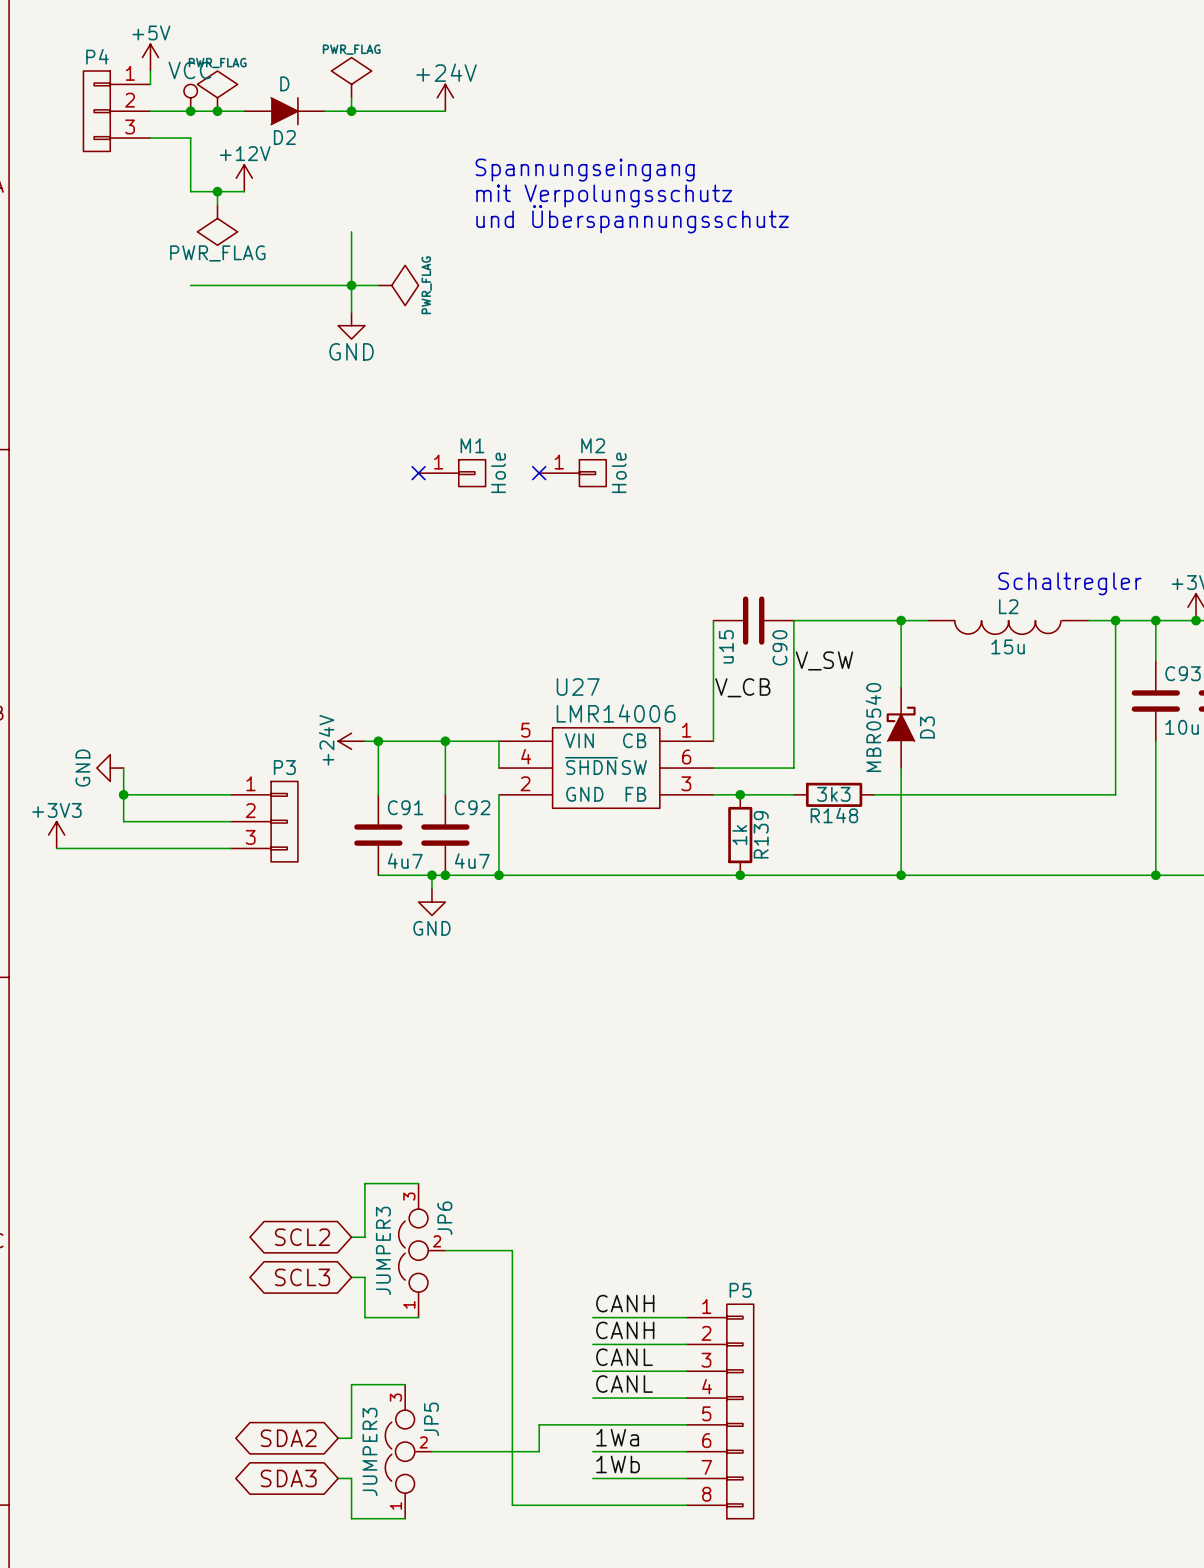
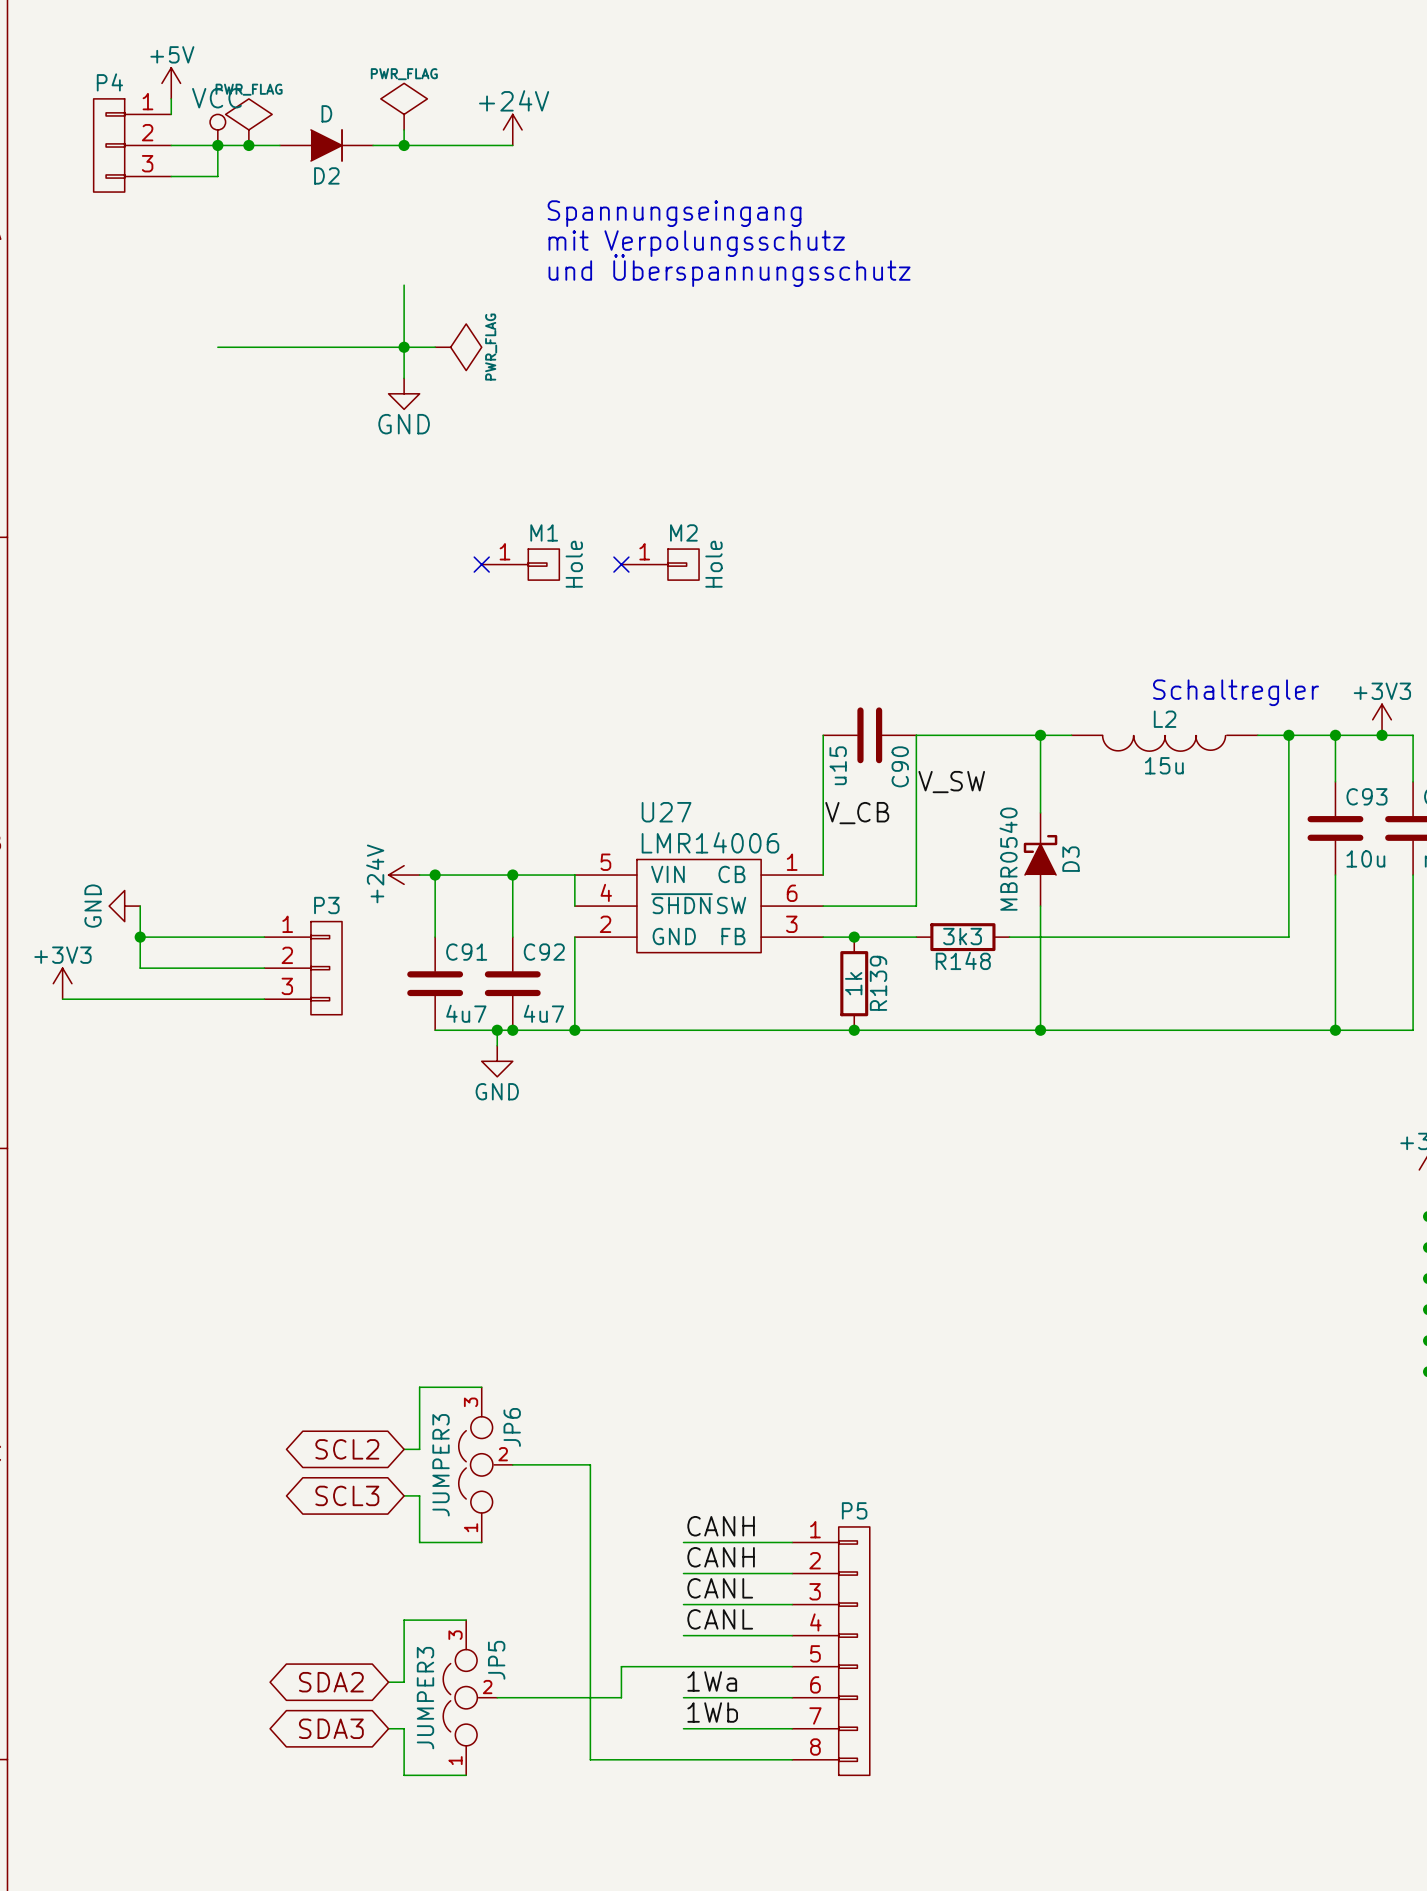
wire: (190, 138) (190, 191) (244, 191) -> (217, 176) (217, 145)
power symbol: +12V (244, 178) -> none
wire: (217, 191) (217, 205) -> none
junction: (217, 191) -> none
power symbol: PWR_FLAG (217, 225) -> none

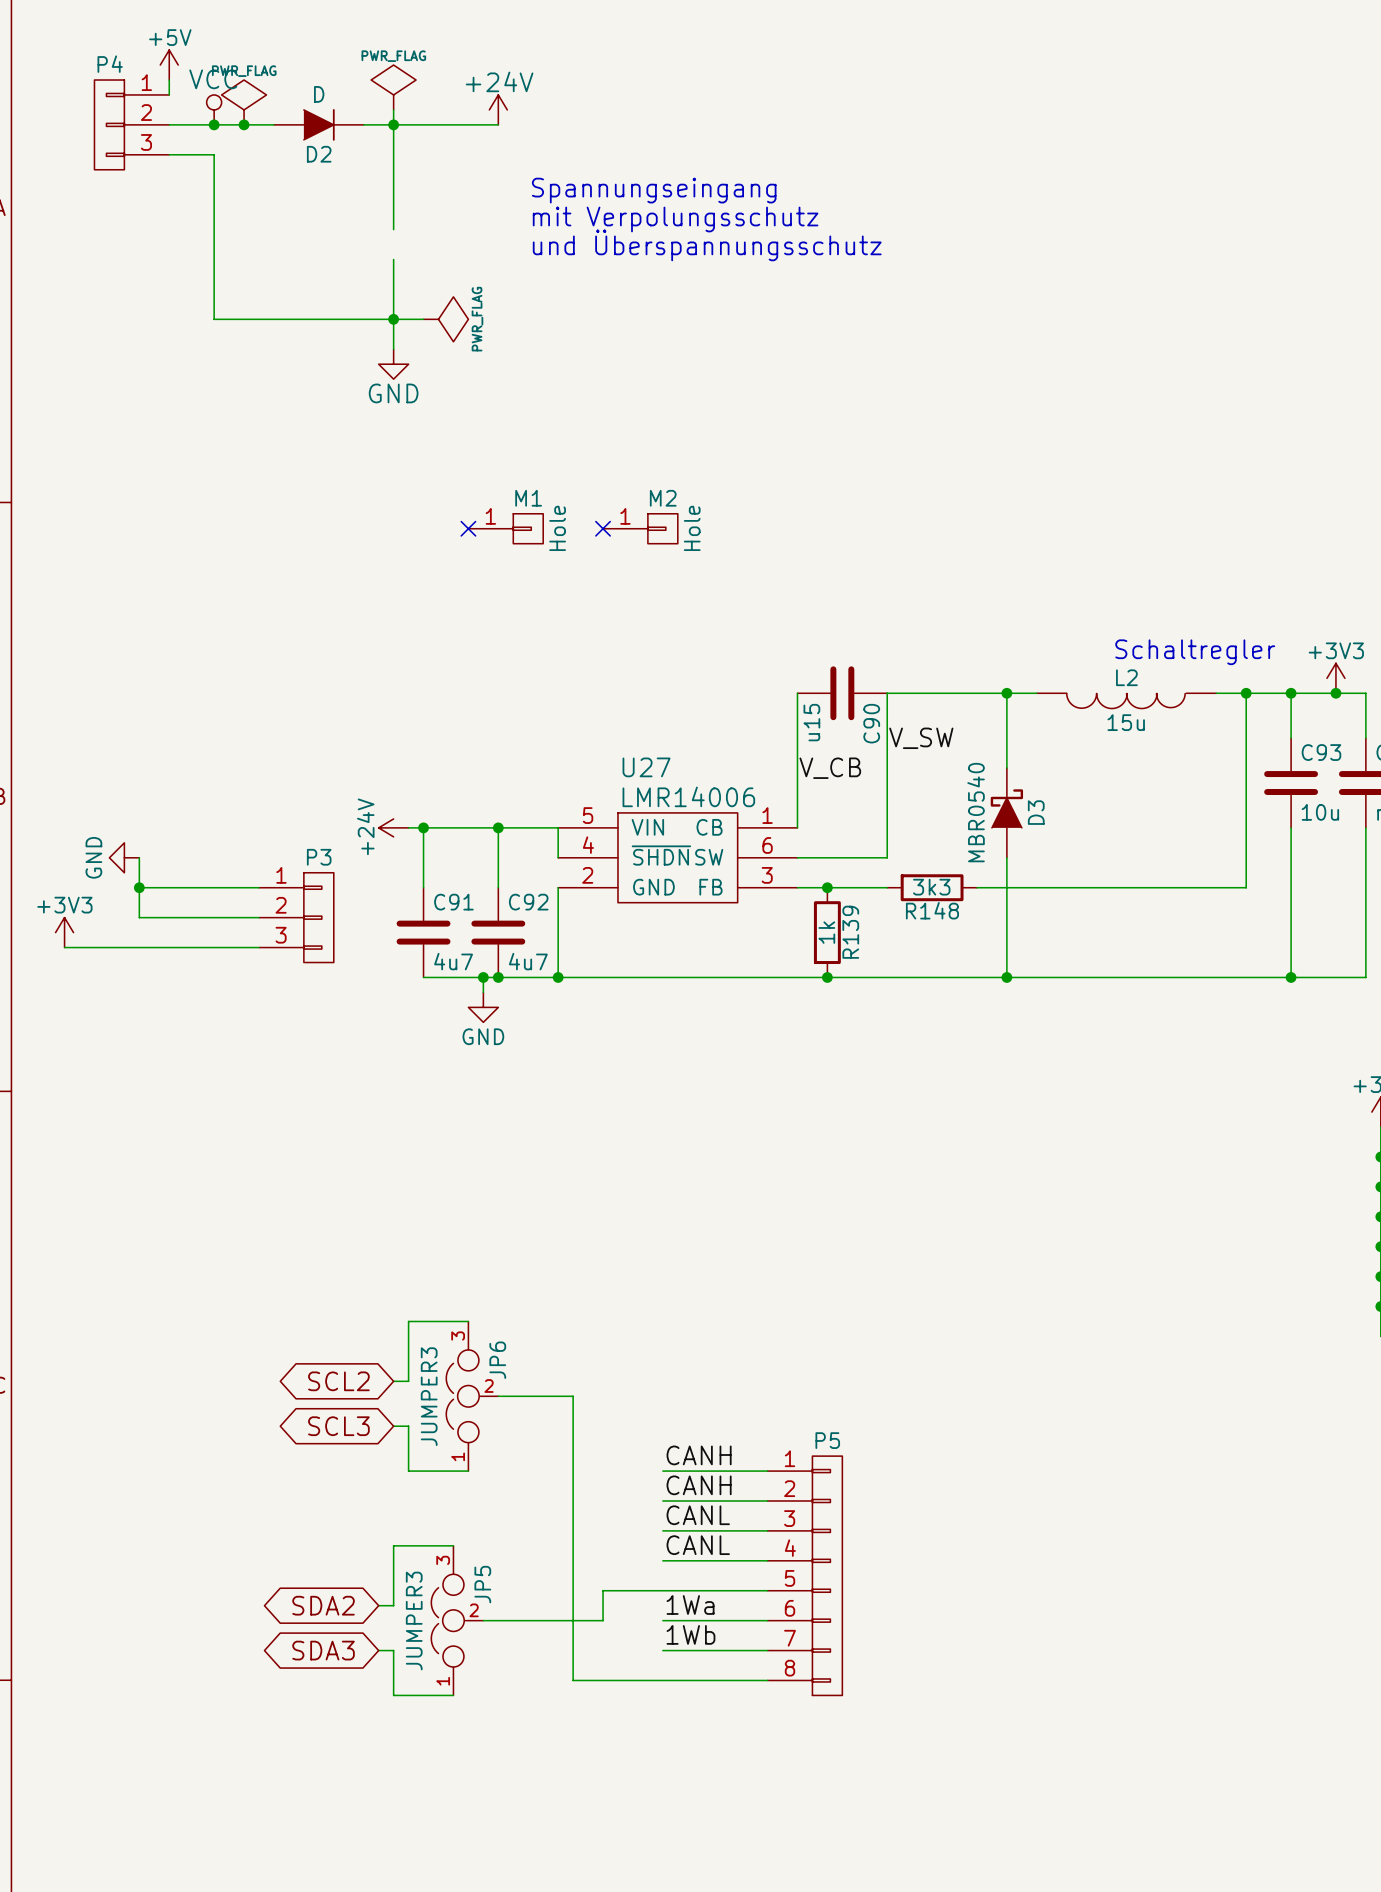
wire: (217, 145) (217, 176) -> (214, 319) (214, 154)
wire: none -> (393, 124) (393, 229)

